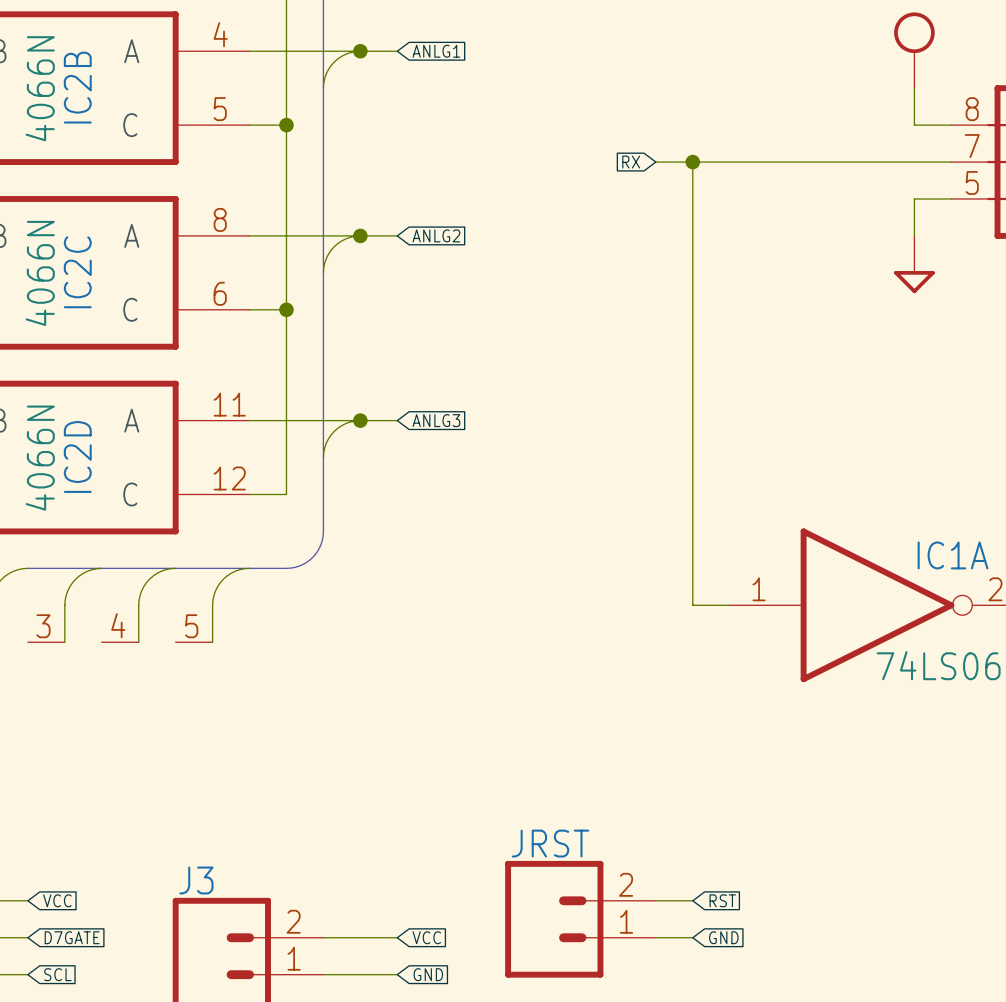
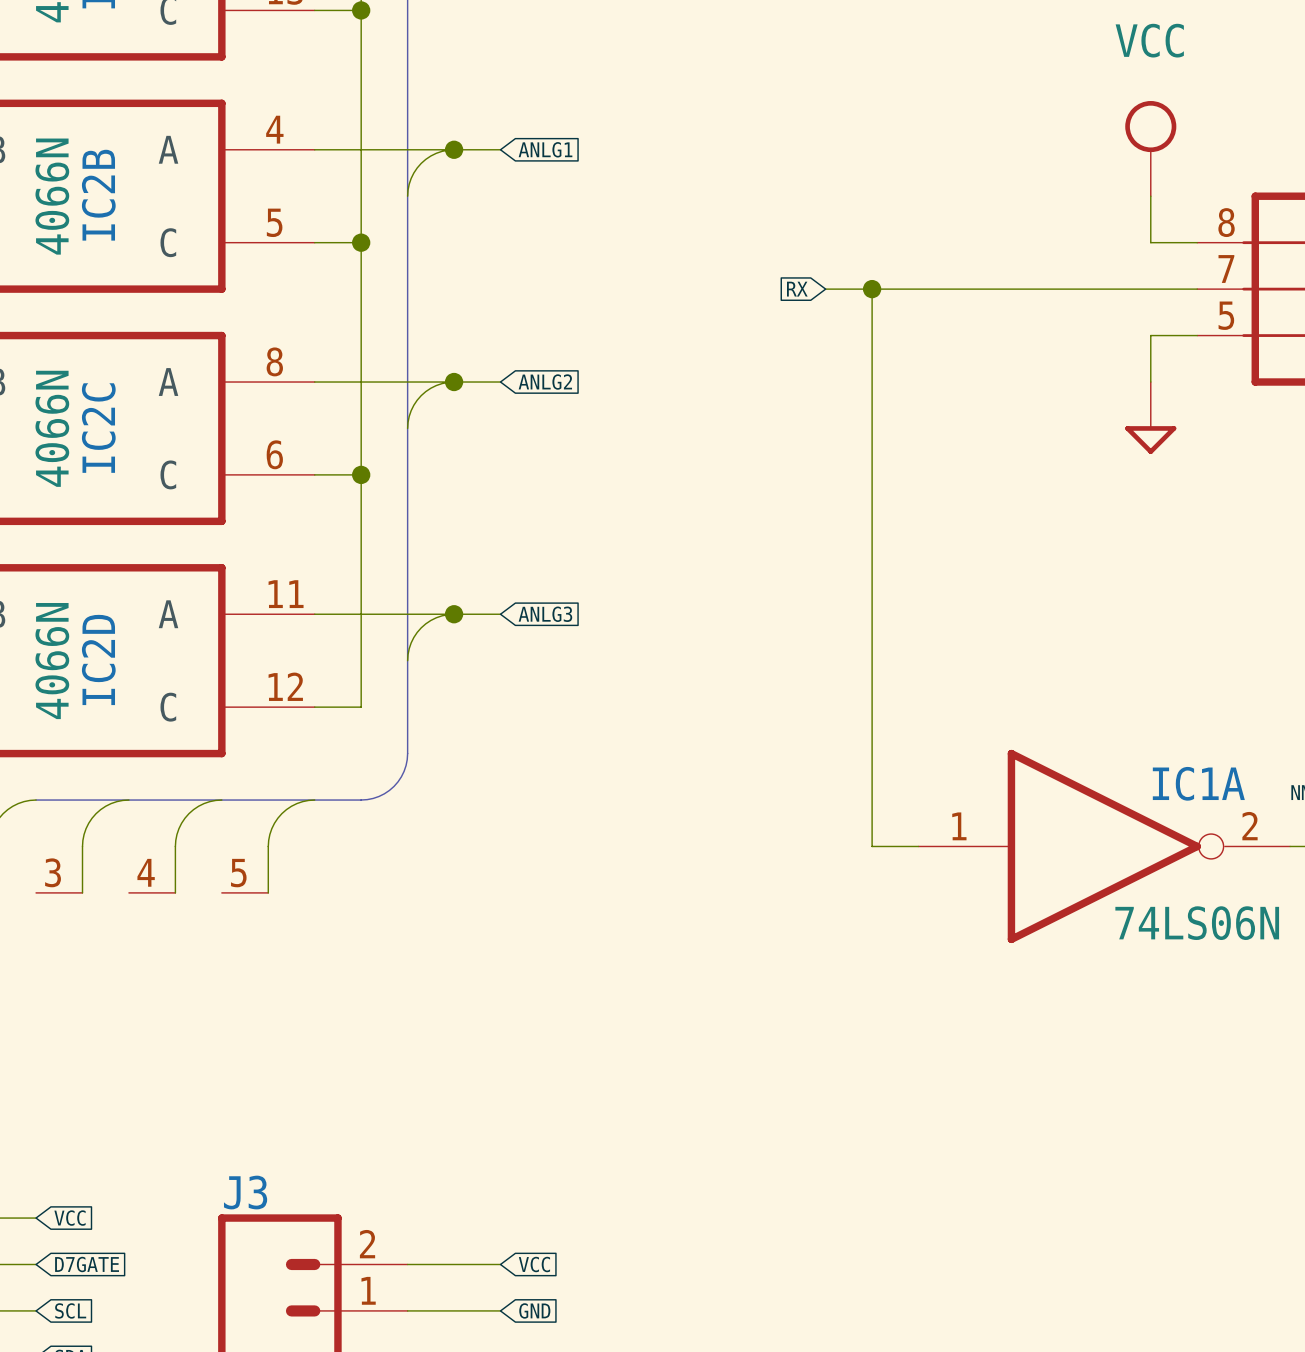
wire: (655, 900) (692, 900) -> none
global label: RST (722, 900) -> none
JRST: (580, 919) -> none
wire: (655, 937) (692, 937) -> none
global label: GND (723, 937) -> none

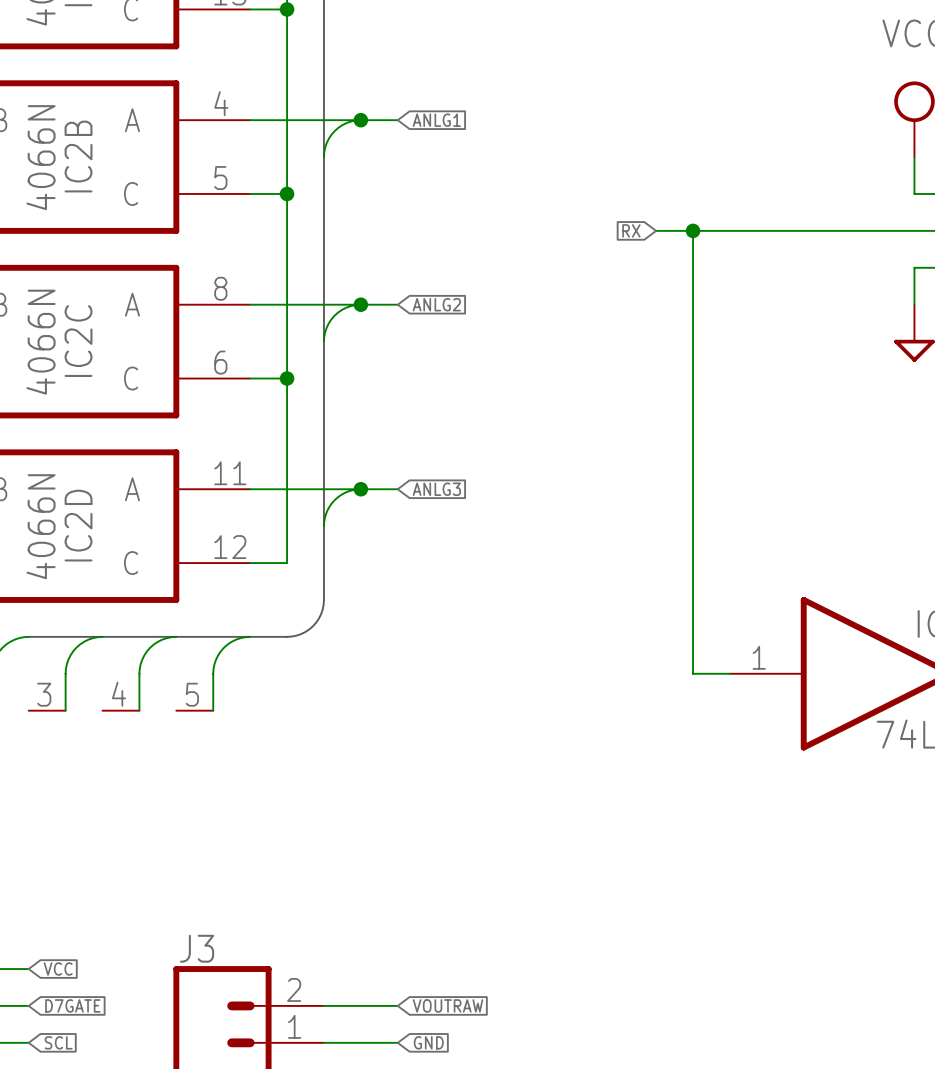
global label: VCC (534, 1264) -> VOUTRAW (447, 1005)

